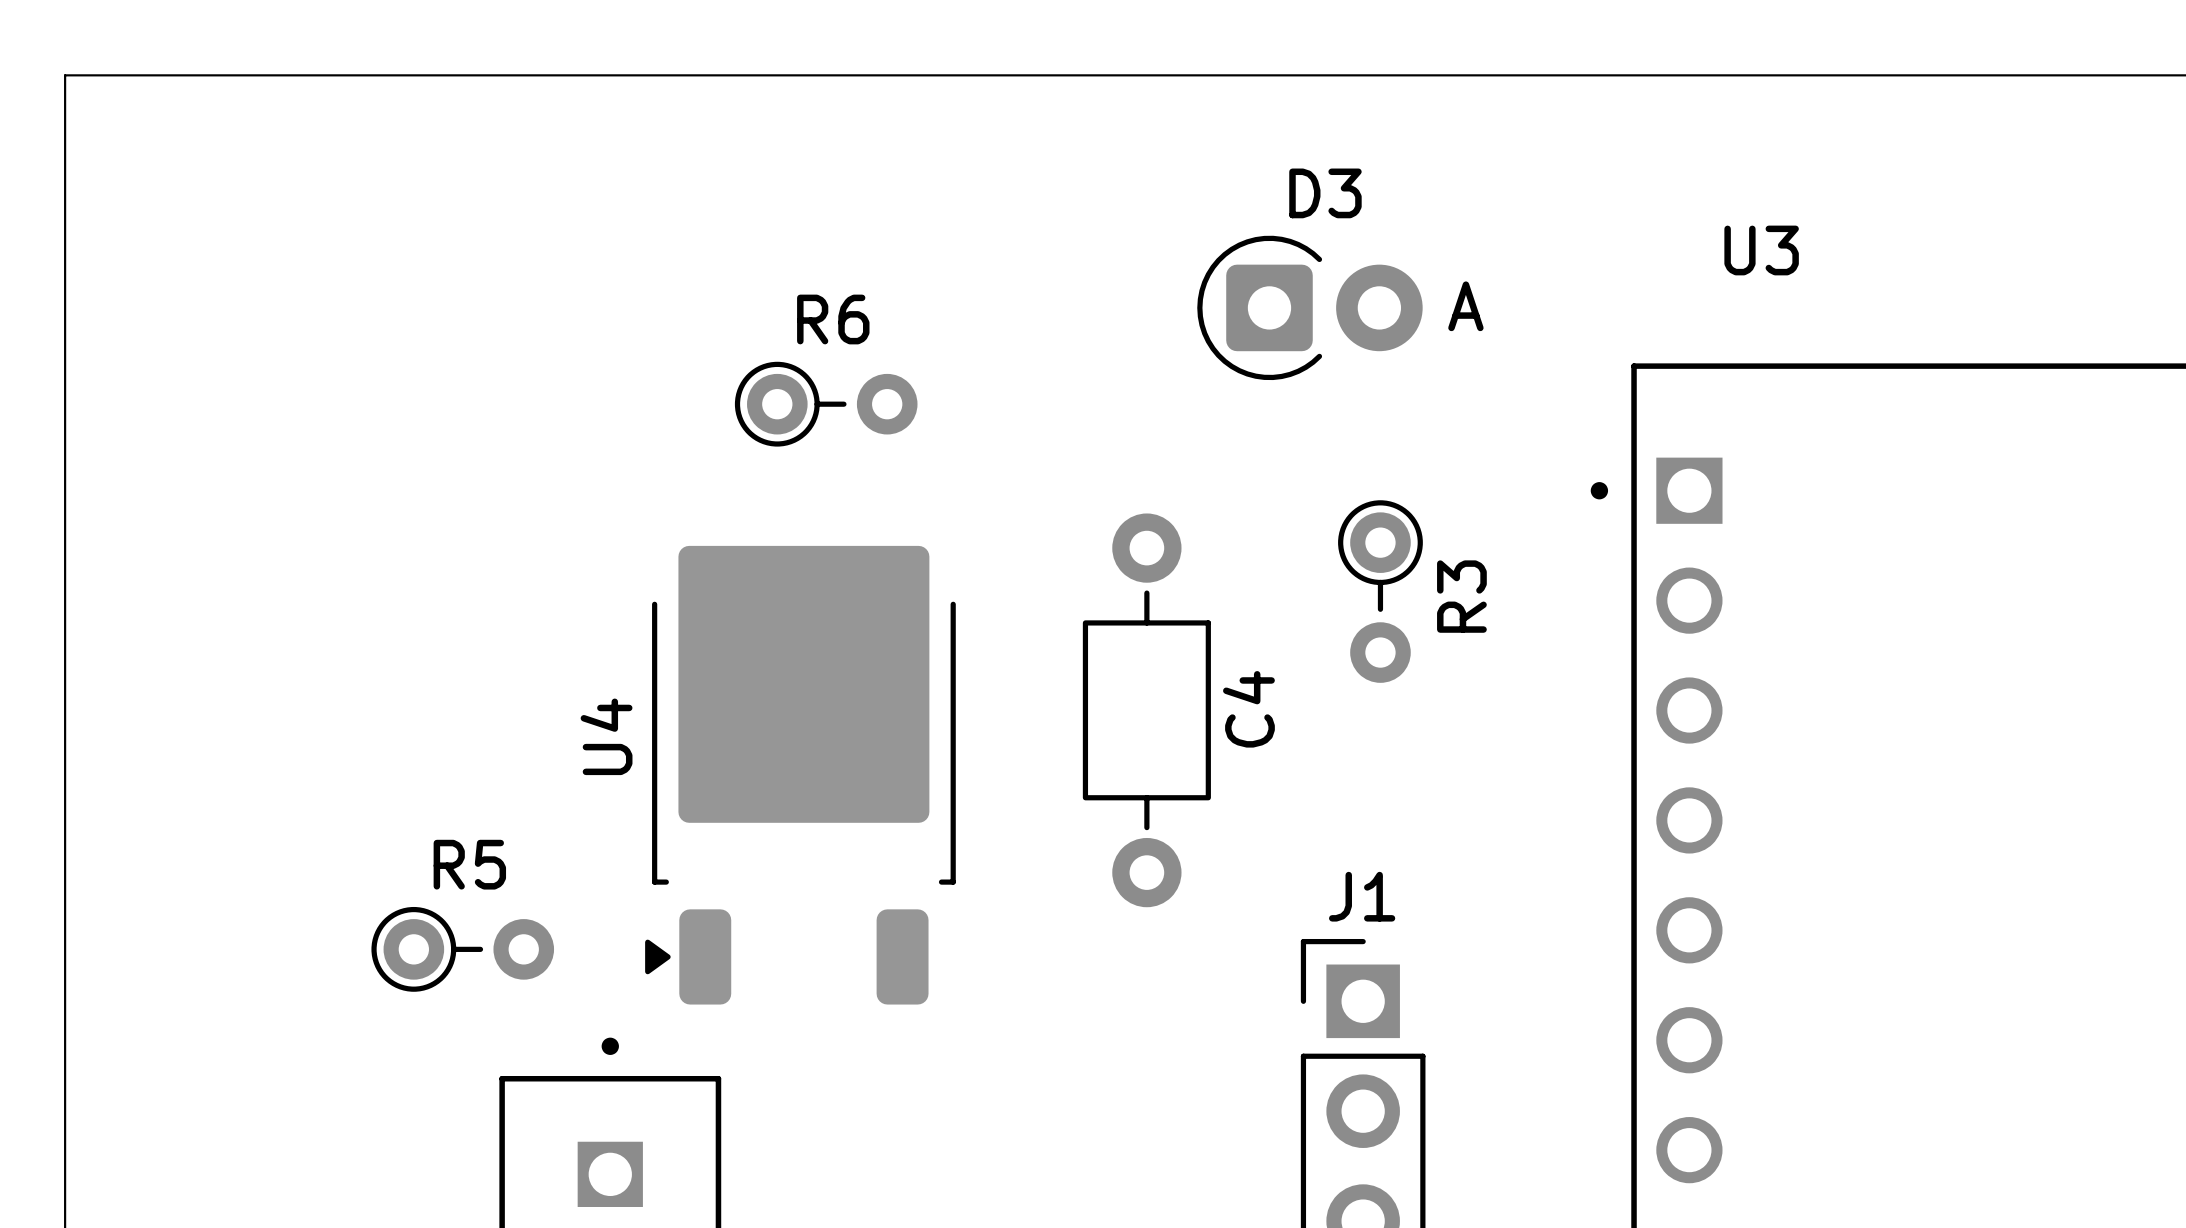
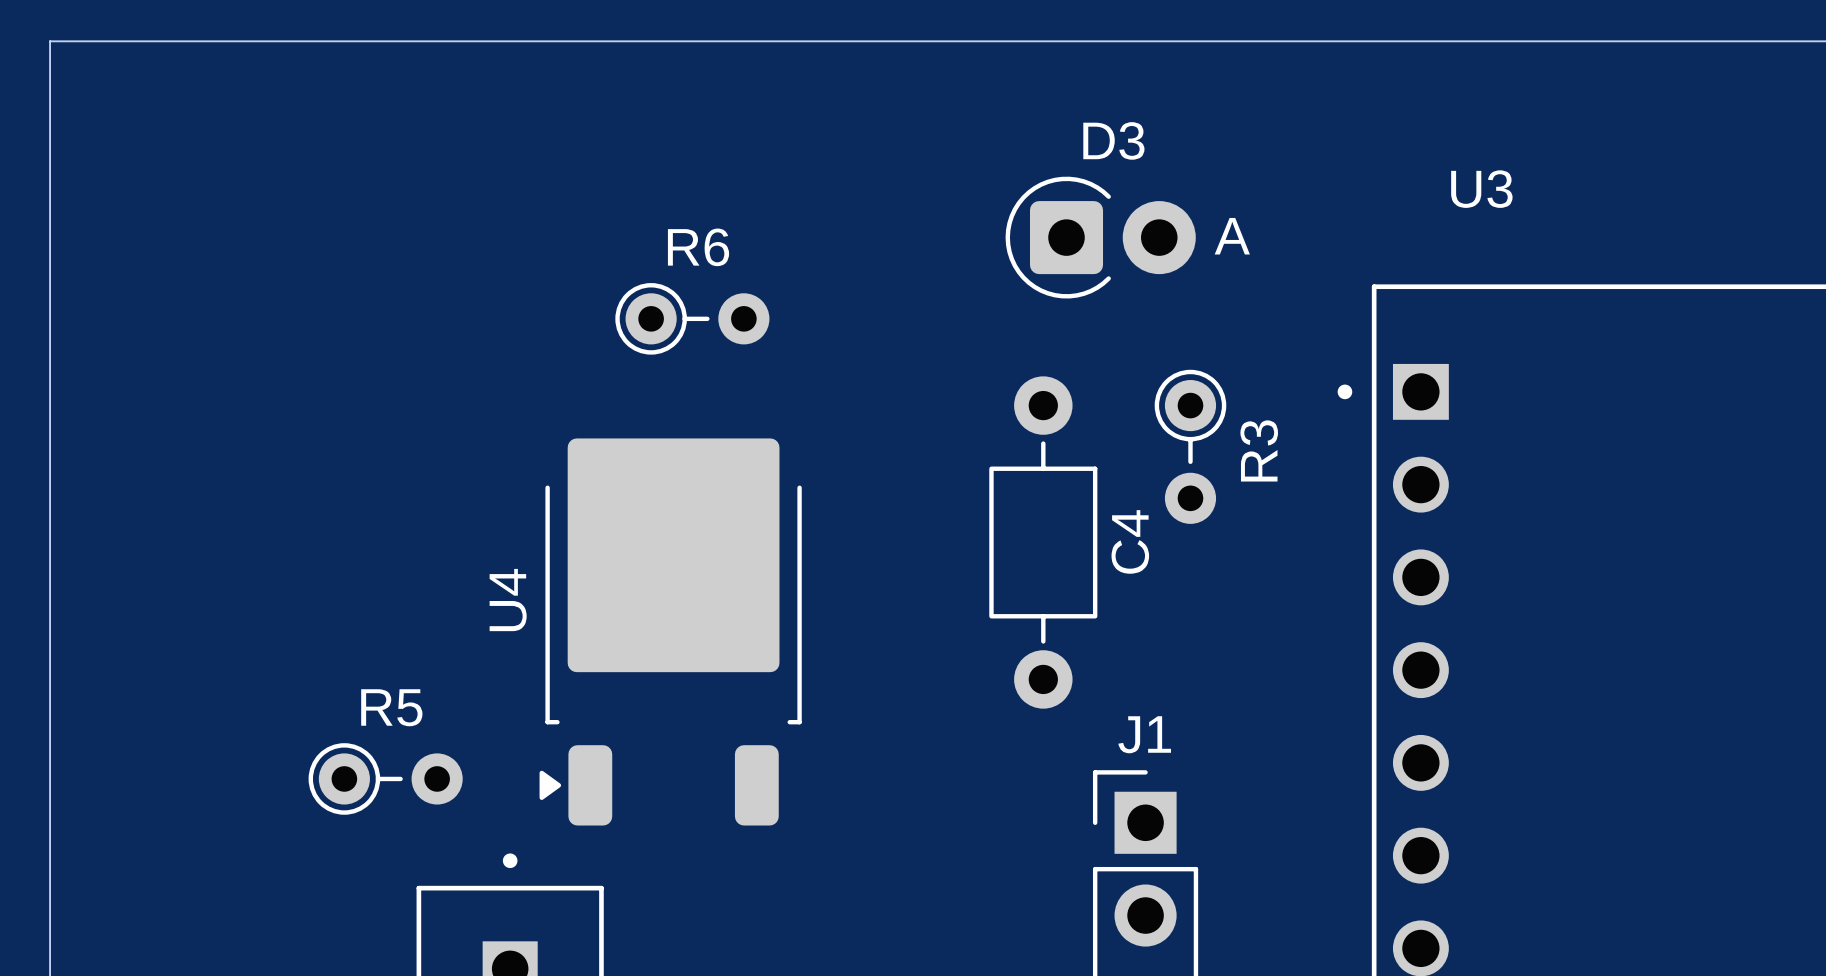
R3 position: (1380, 591) -> (1190, 446)
C4 position: (1146, 710) -> (1043, 542)

